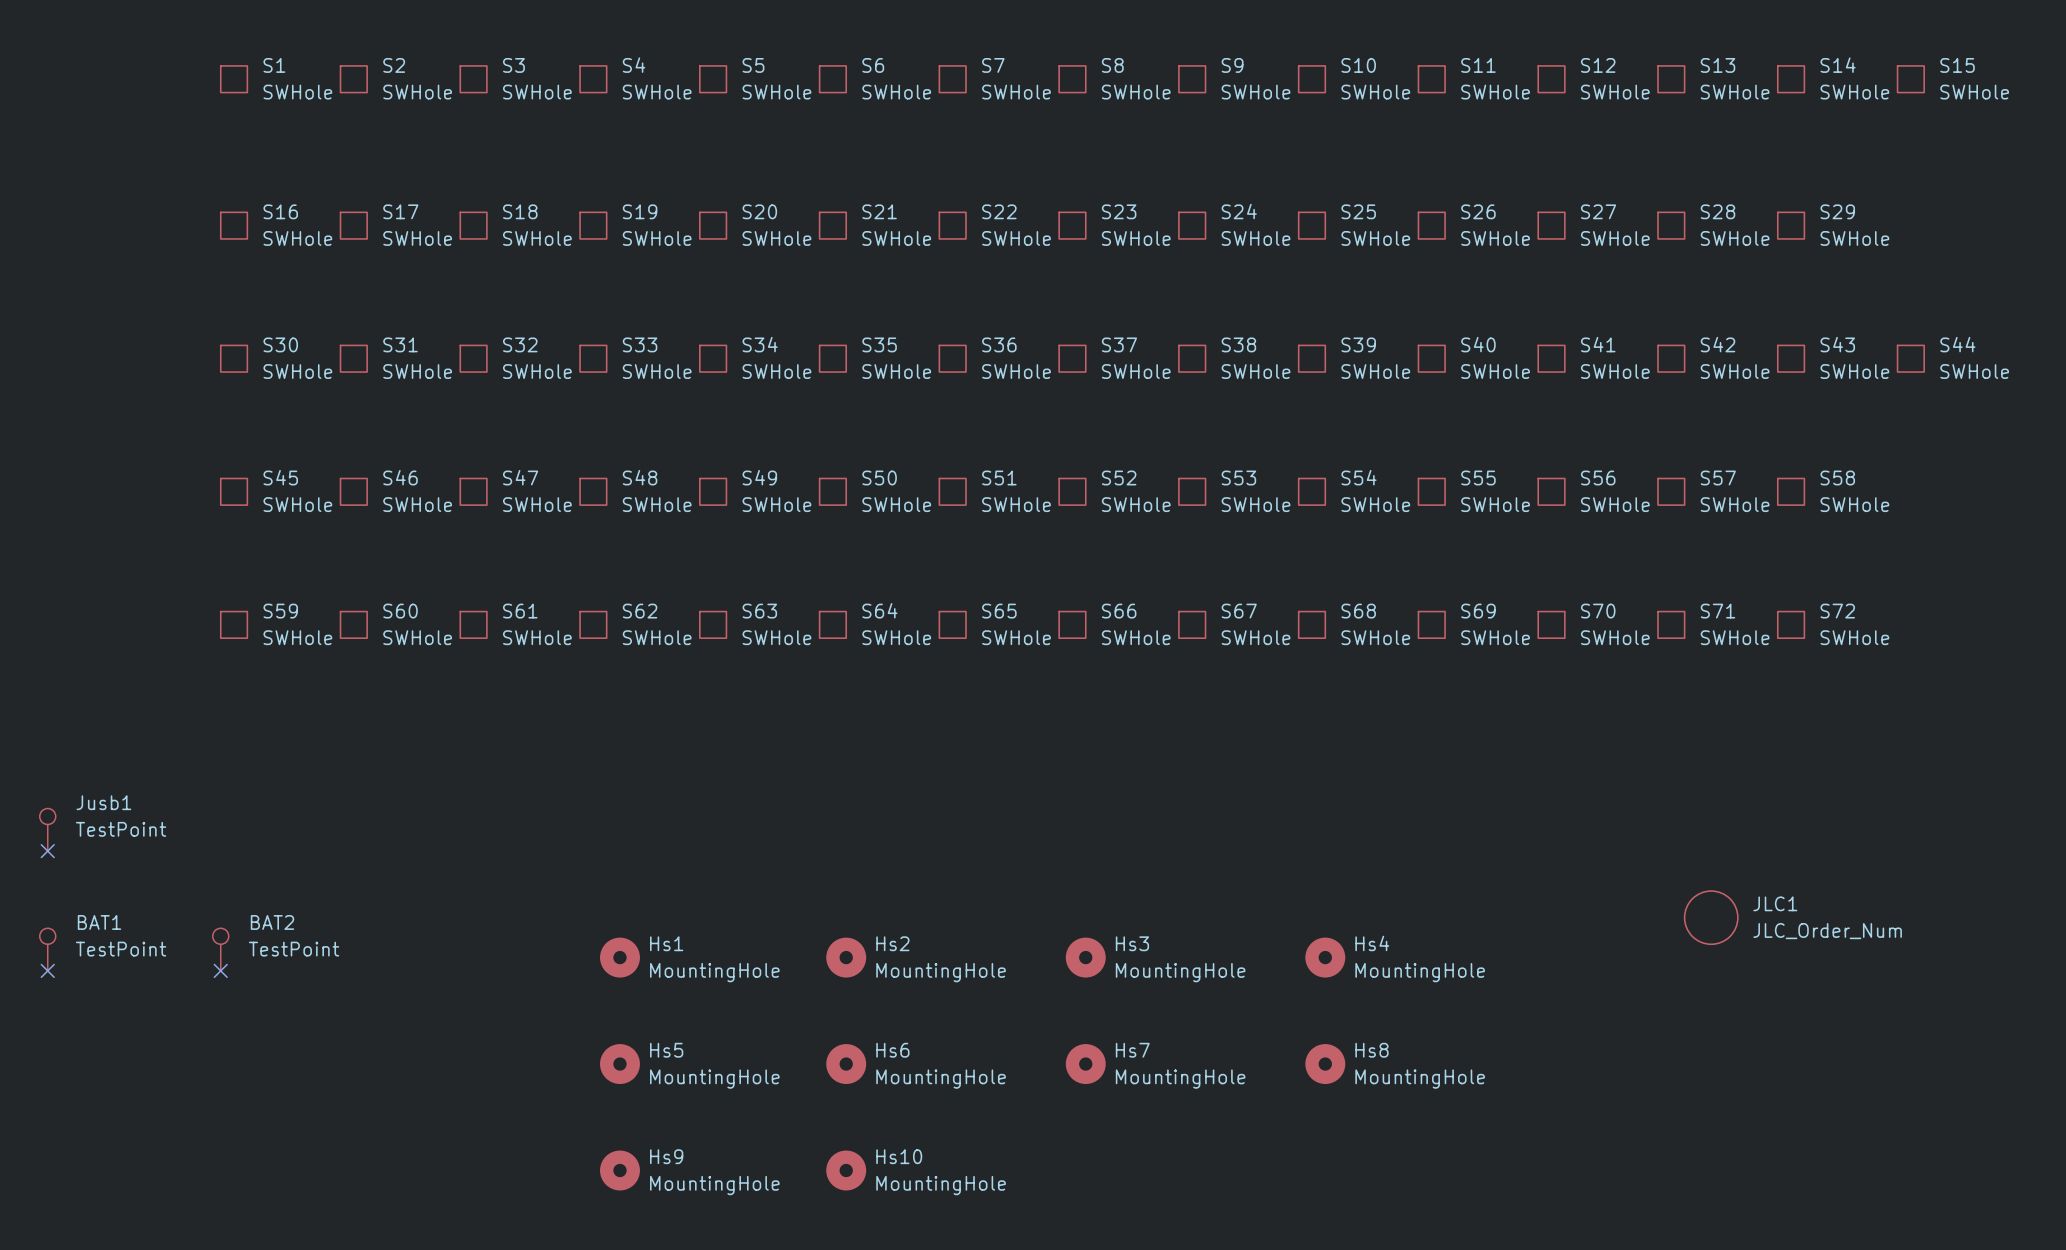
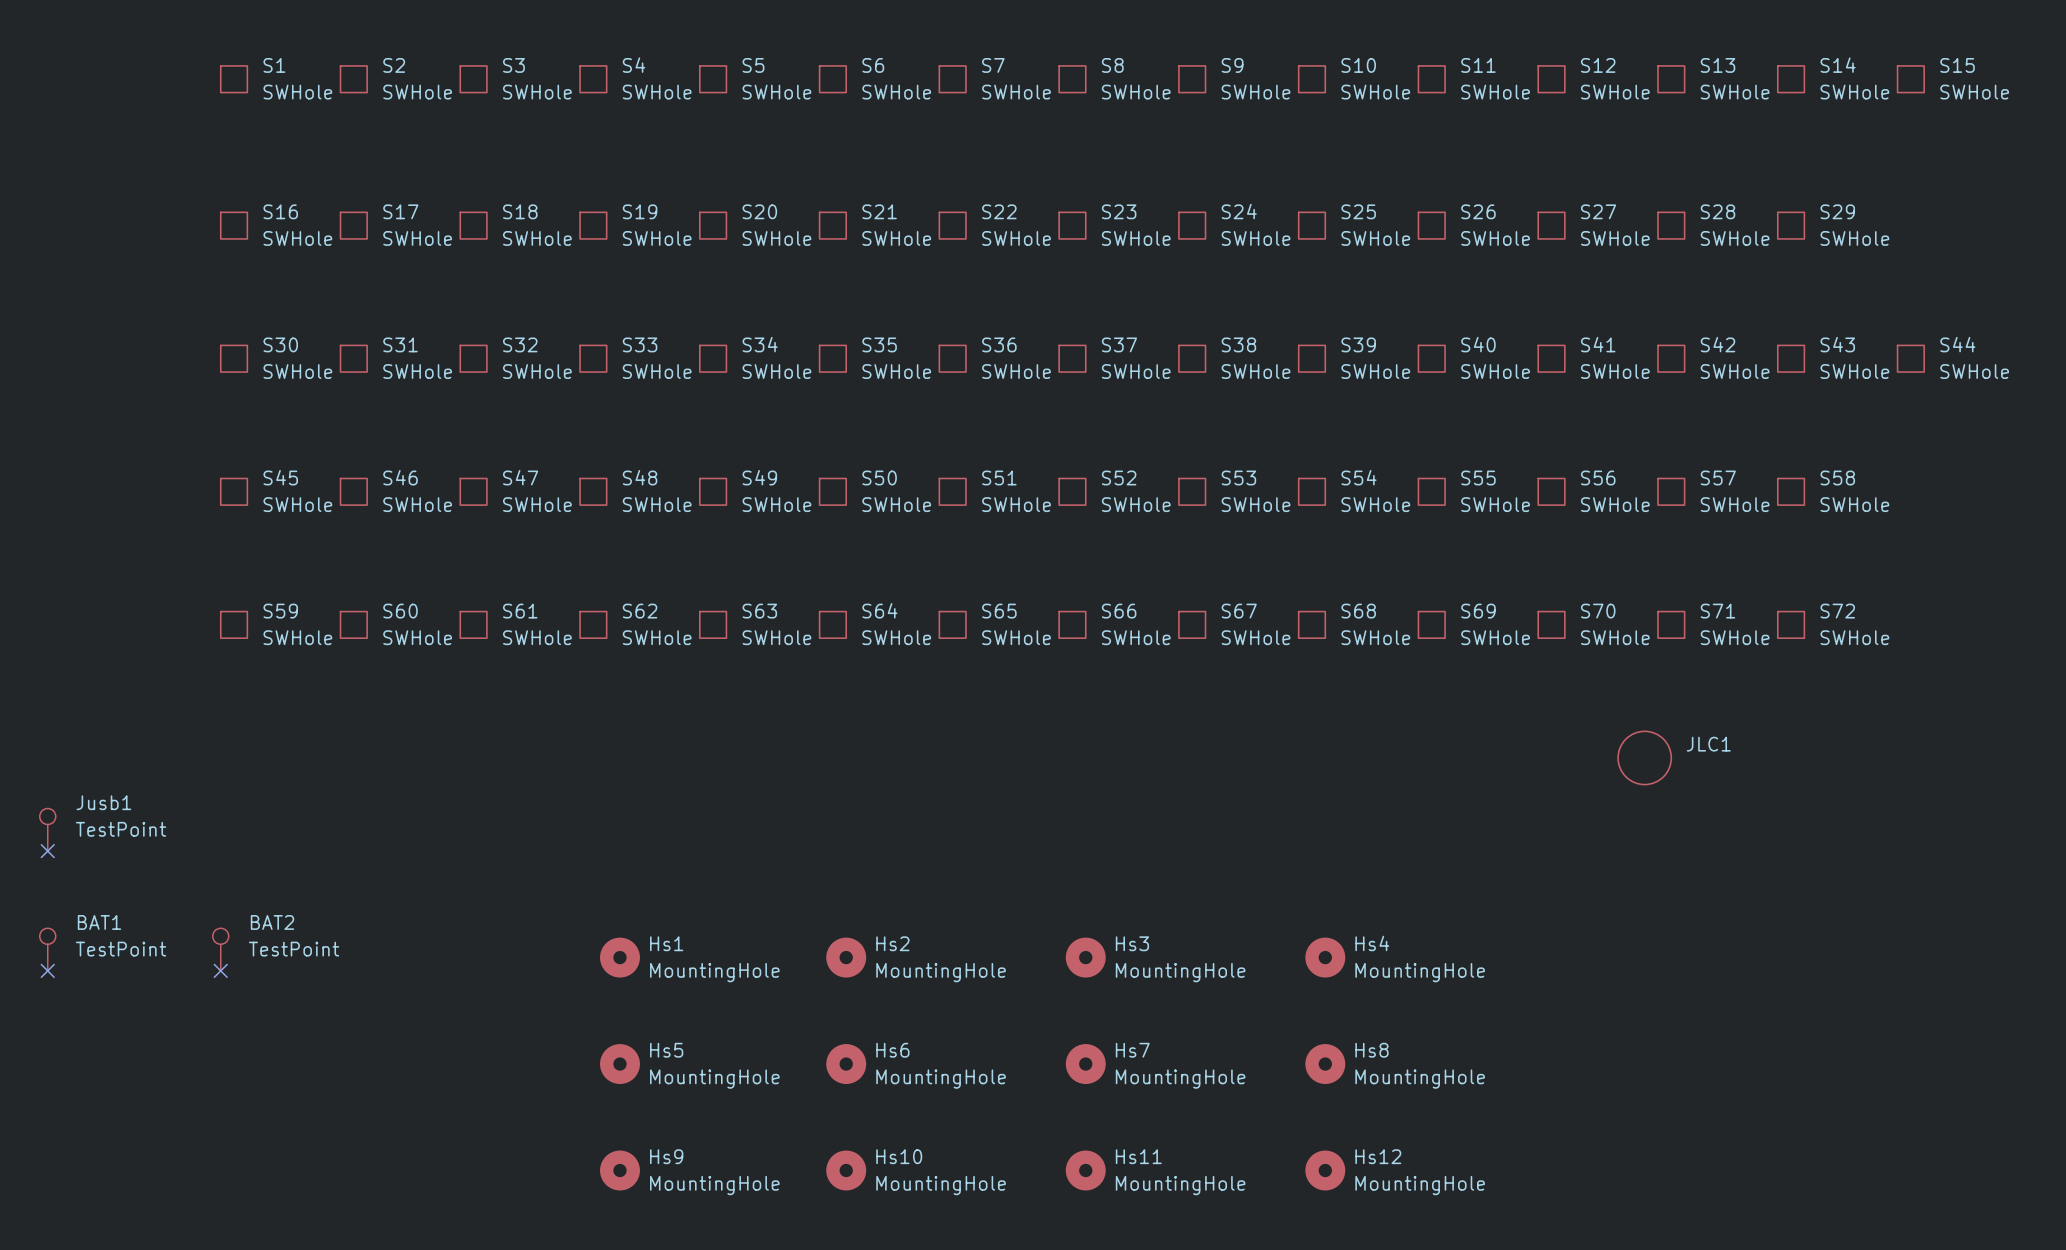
JLC1 position: (1711, 917) -> (1644, 757)
JLC1 value: JLC_Order_Num (1827, 931) -> none
Hs11: none -> MountingHole (1085, 1170)
Hs12: none -> MountingHole (1325, 1170)

